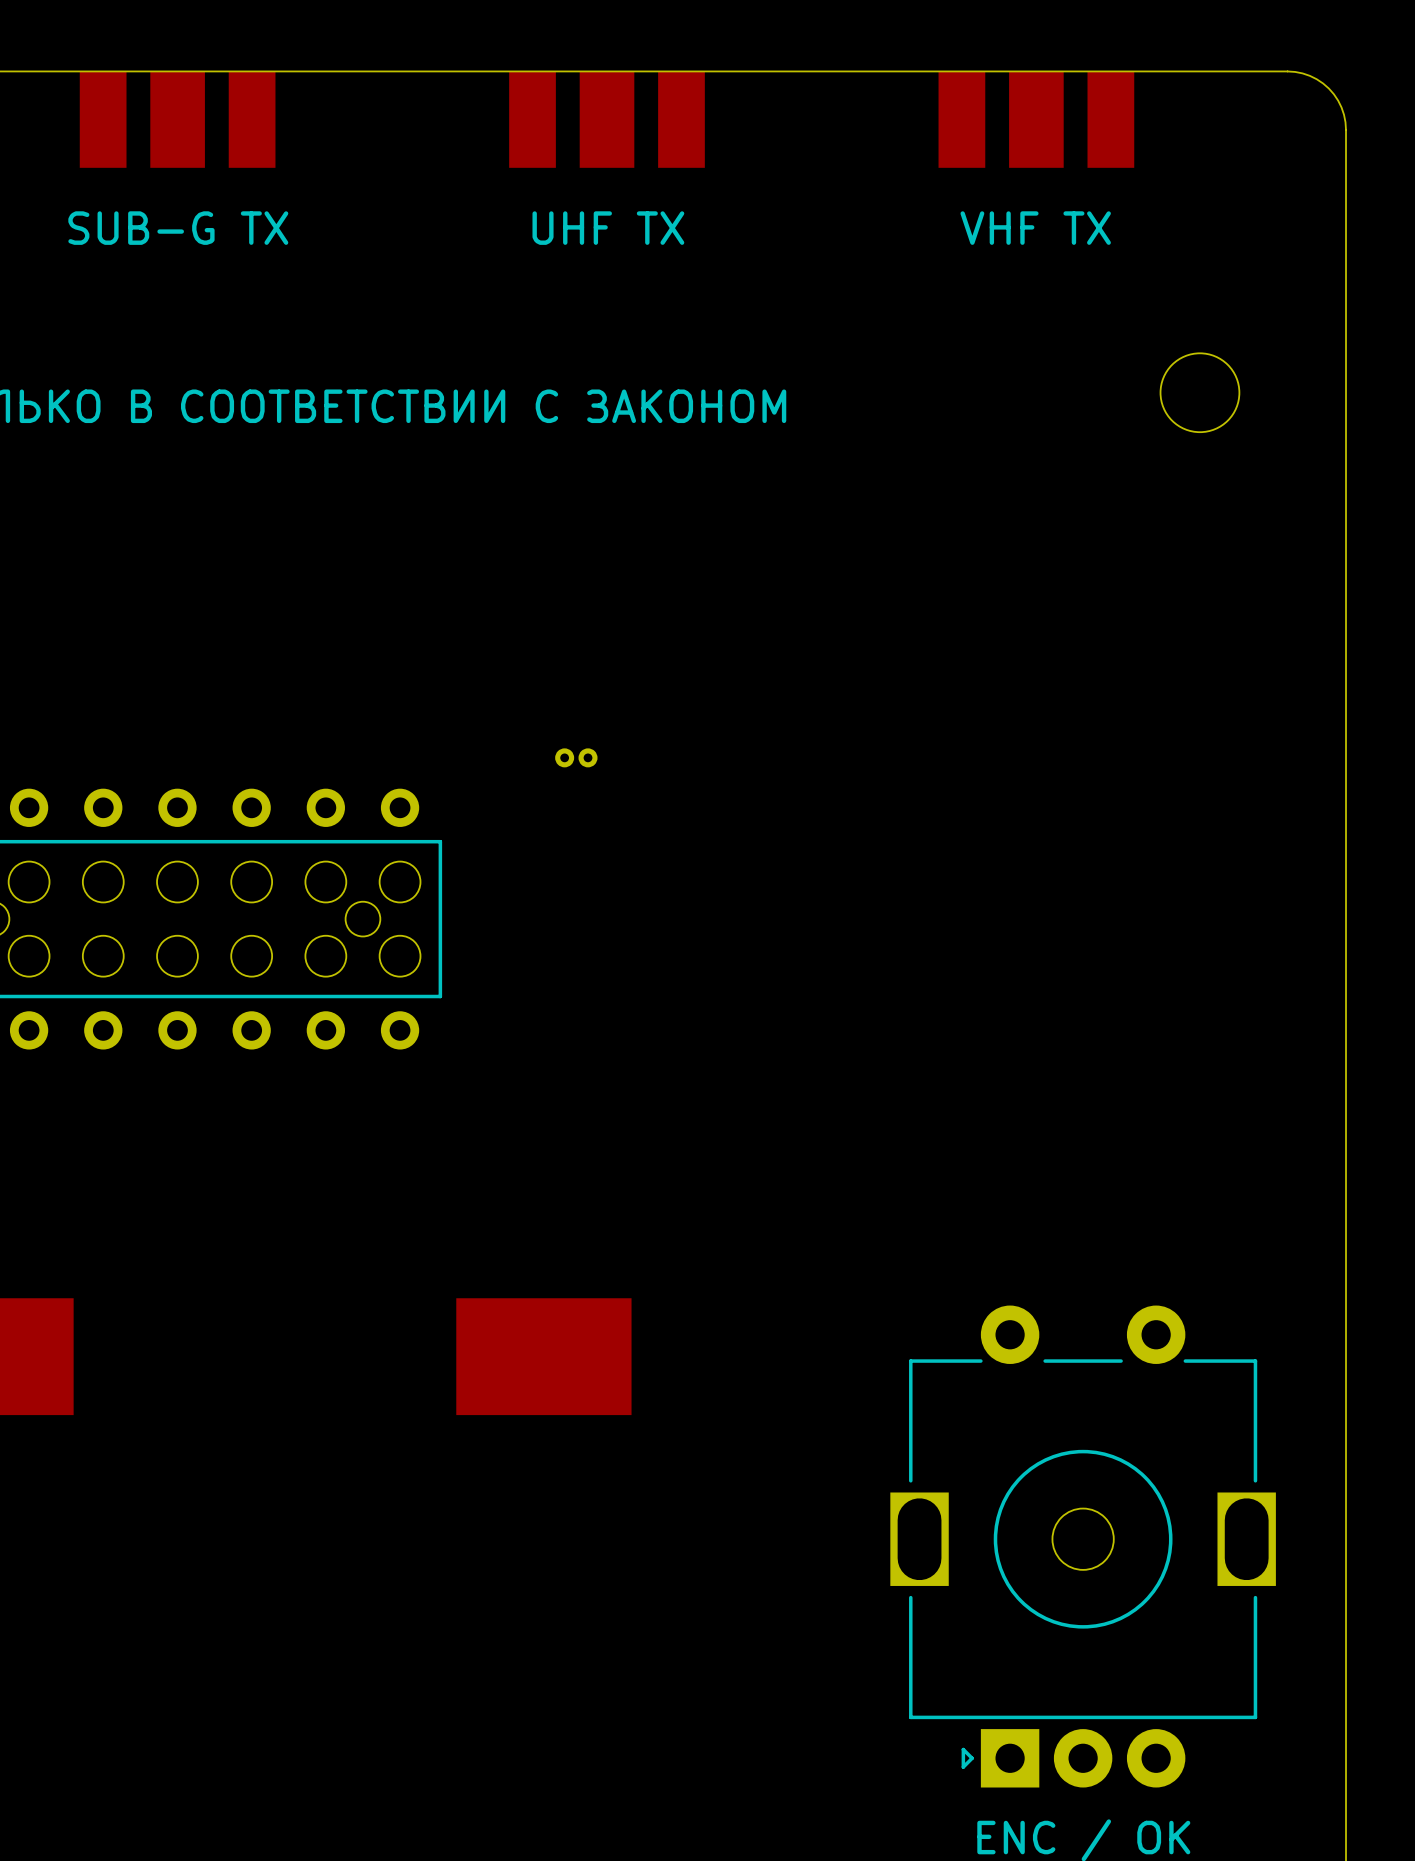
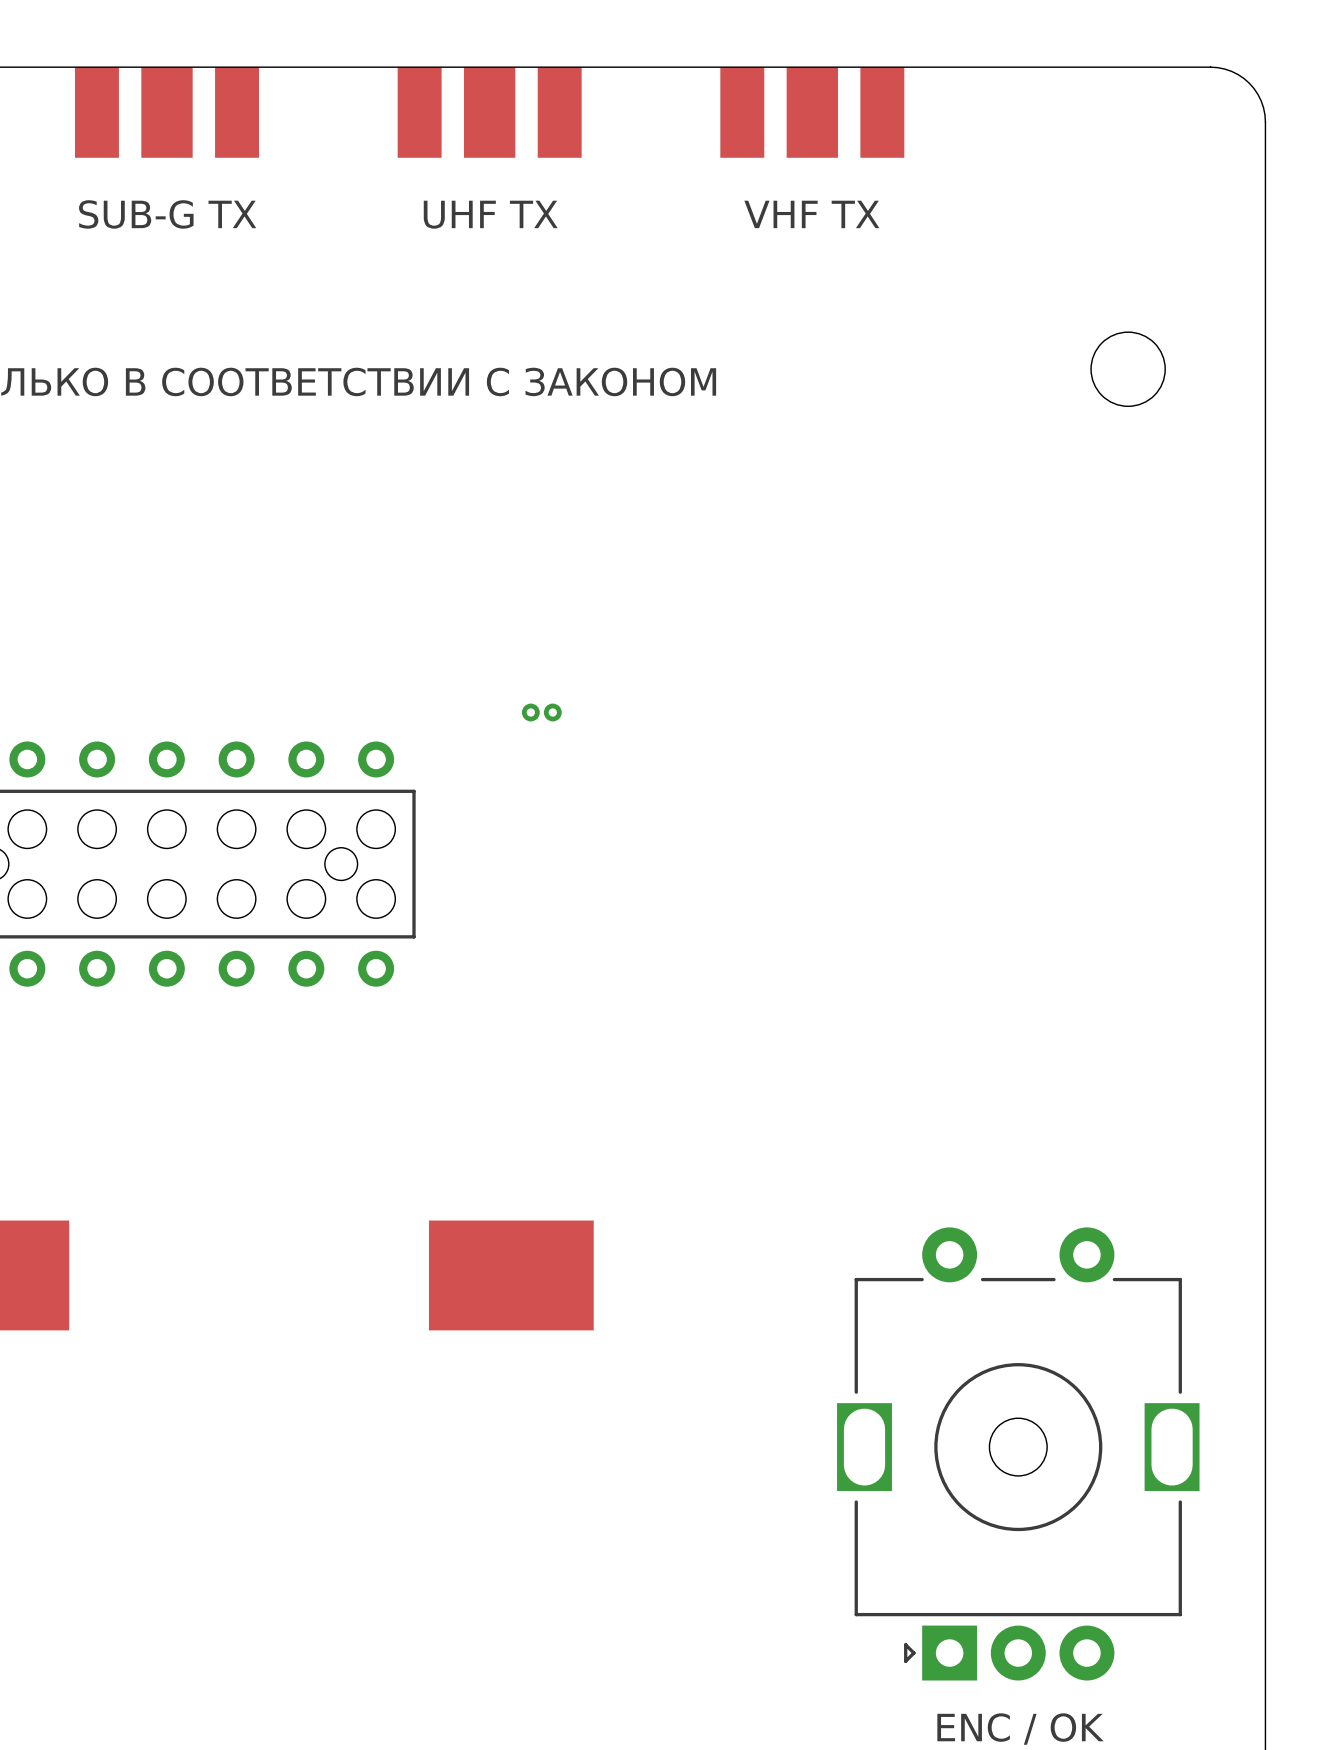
part position: (607, 119) -> (489, 112)
part: none -> (812, 112)
part: (1036, 119) -> none
text position: UHF TX (608, 228) -> UHF TX (490, 214)
text position: VHF TX (1035, 228) -> VHF TX (811, 214)

